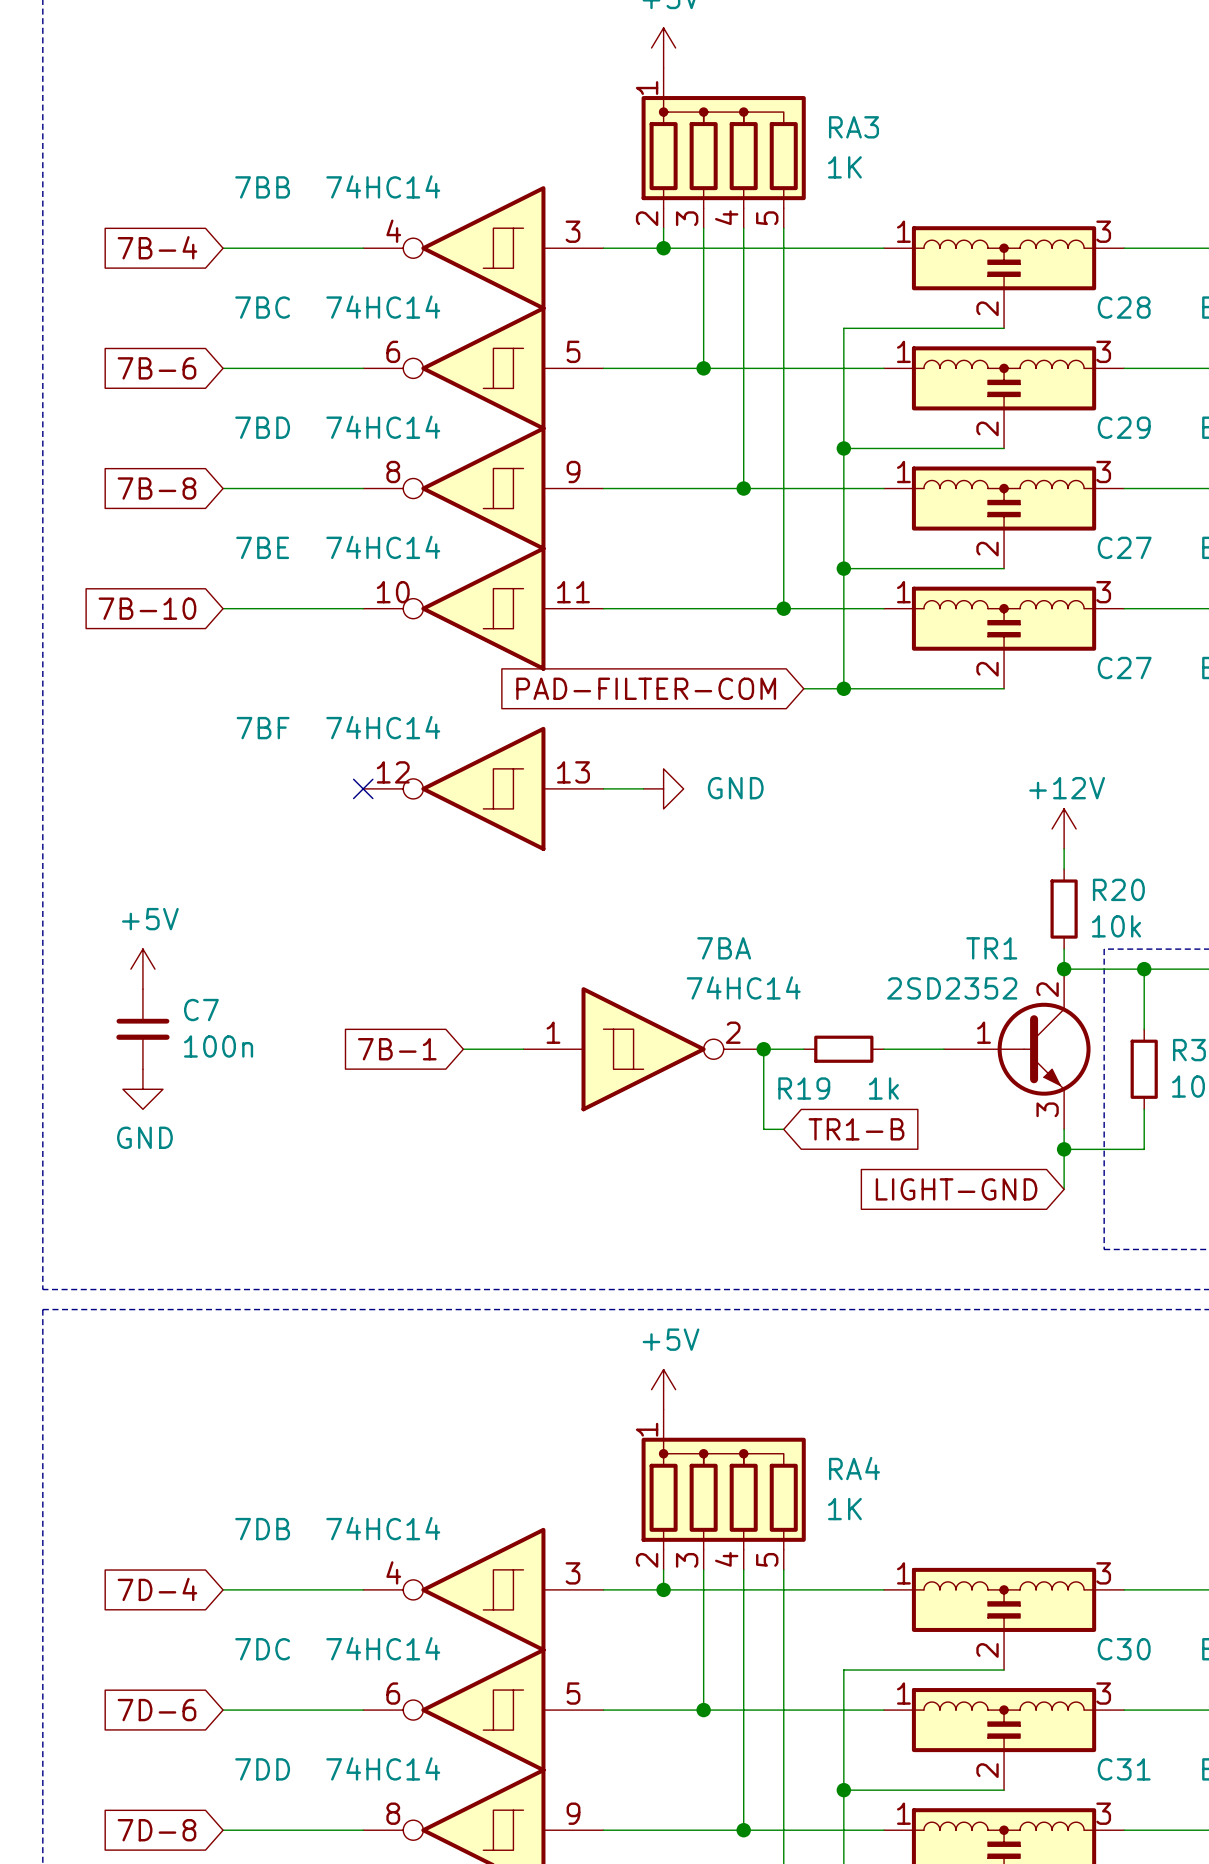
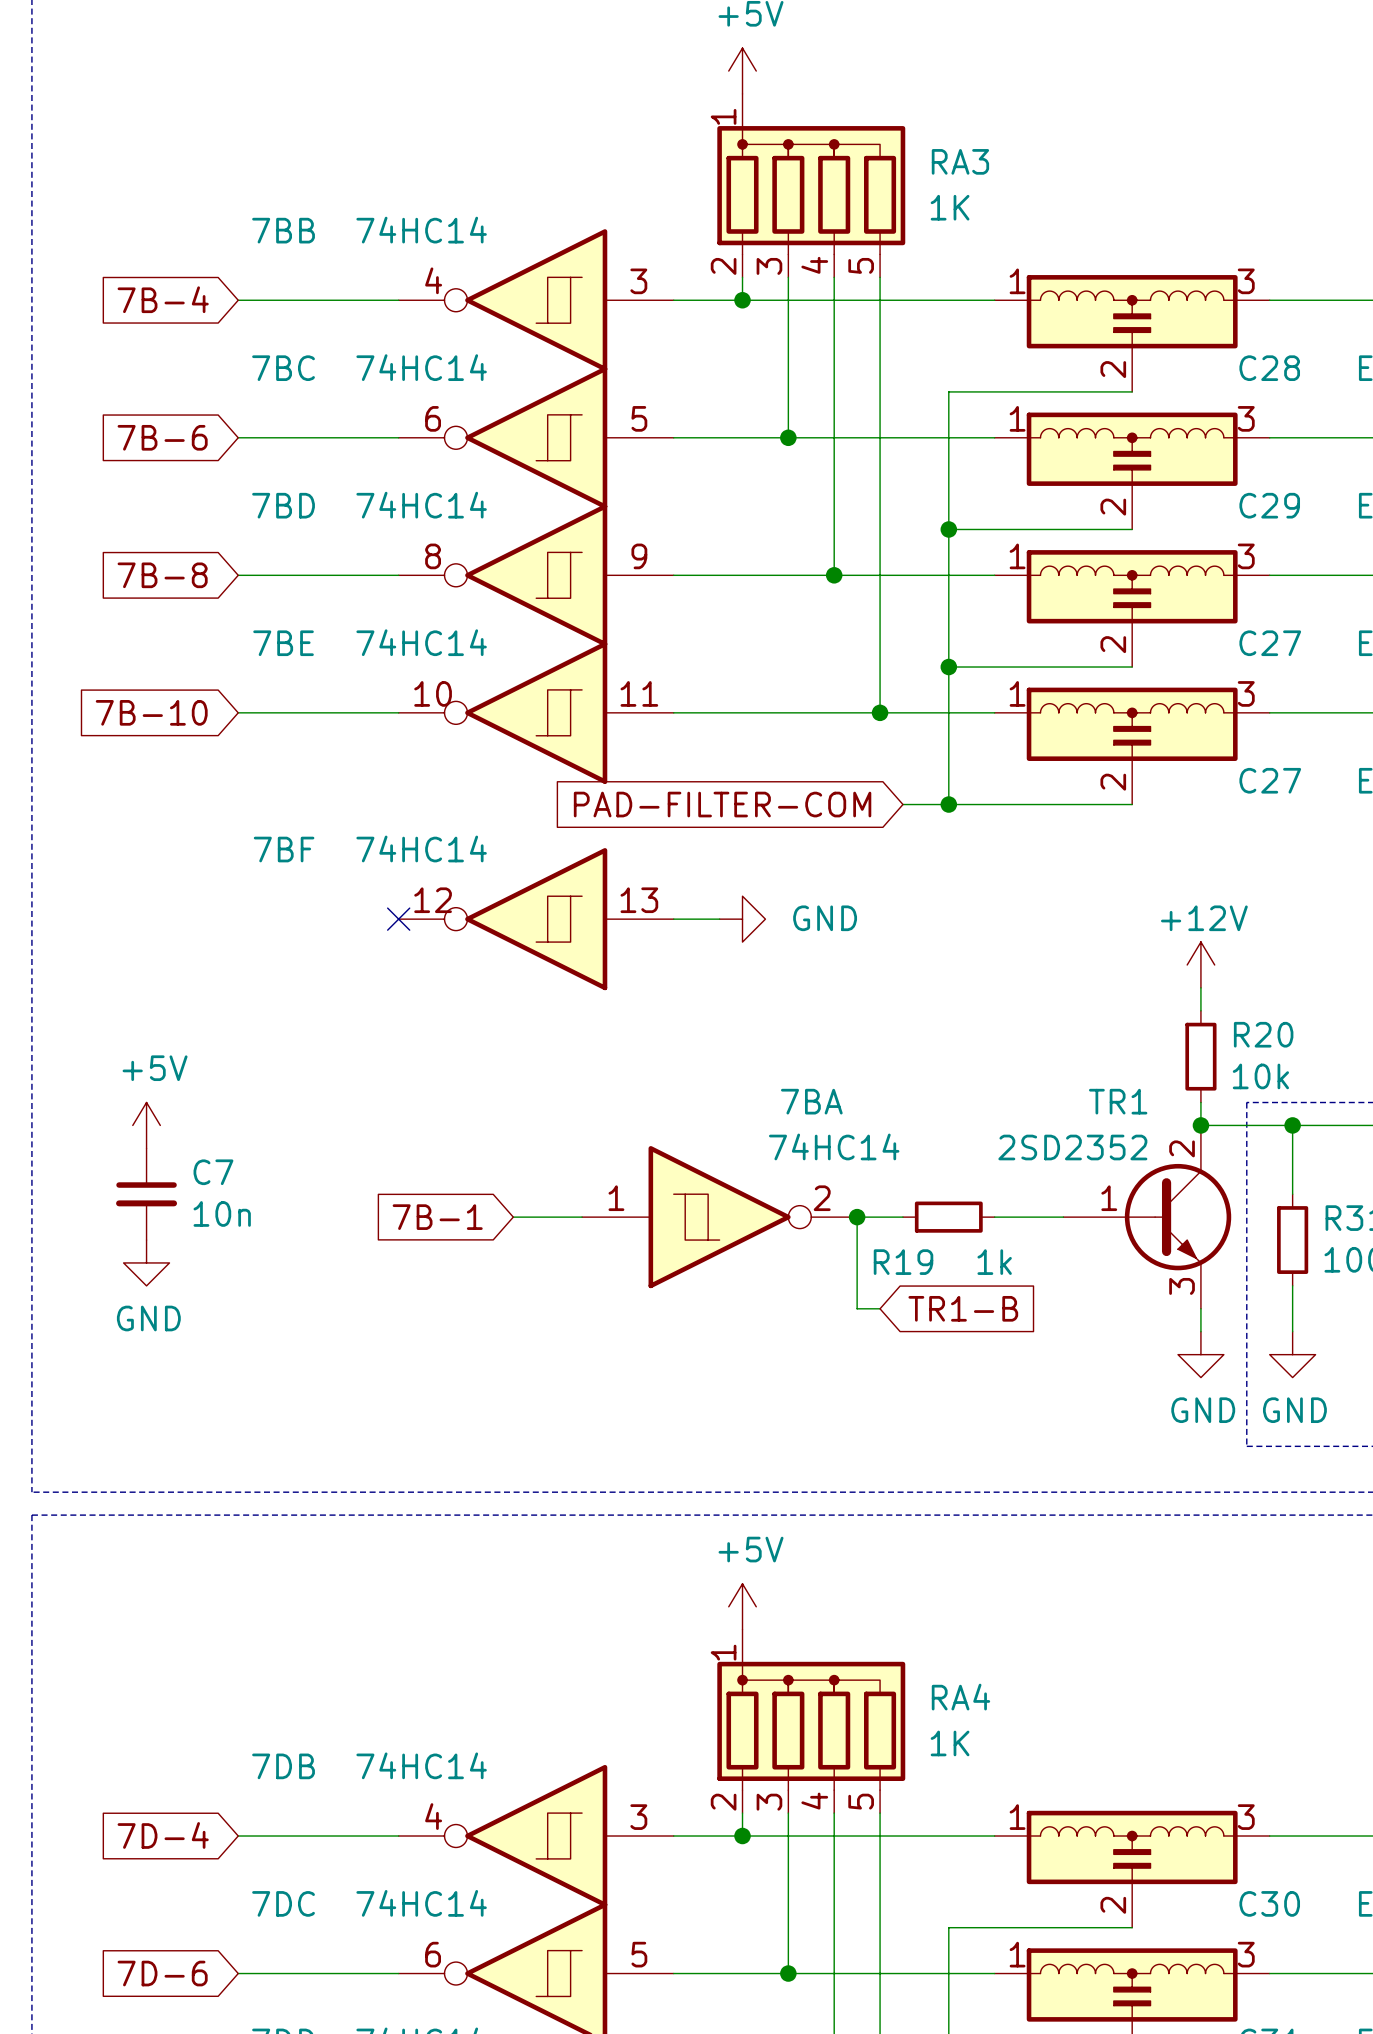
C7 value: 100n (218, 1046) -> 10n (222, 1213)
junction: (1064, 1149) -> none
wire: (1144, 1149) (1064, 1149) (1064, 1189) -> none
power symbol: none -> GND (1200, 1354)
power symbol: none -> GND (1292, 1354)
global label: LIGHT-GND (956, 1189) -> none

